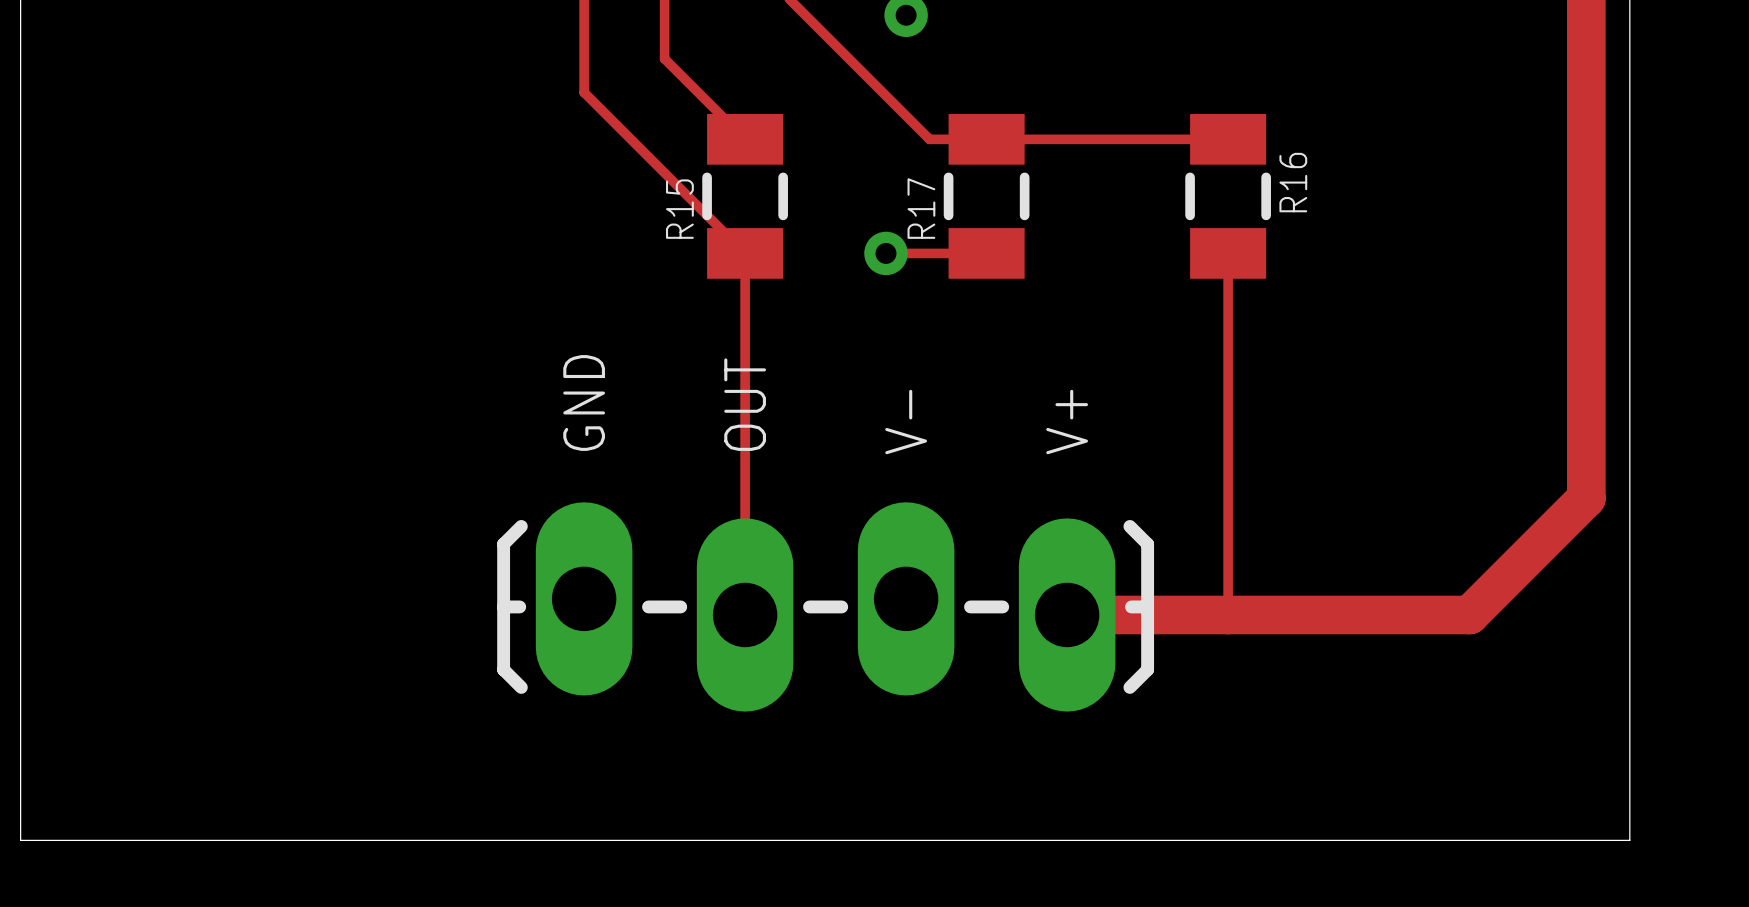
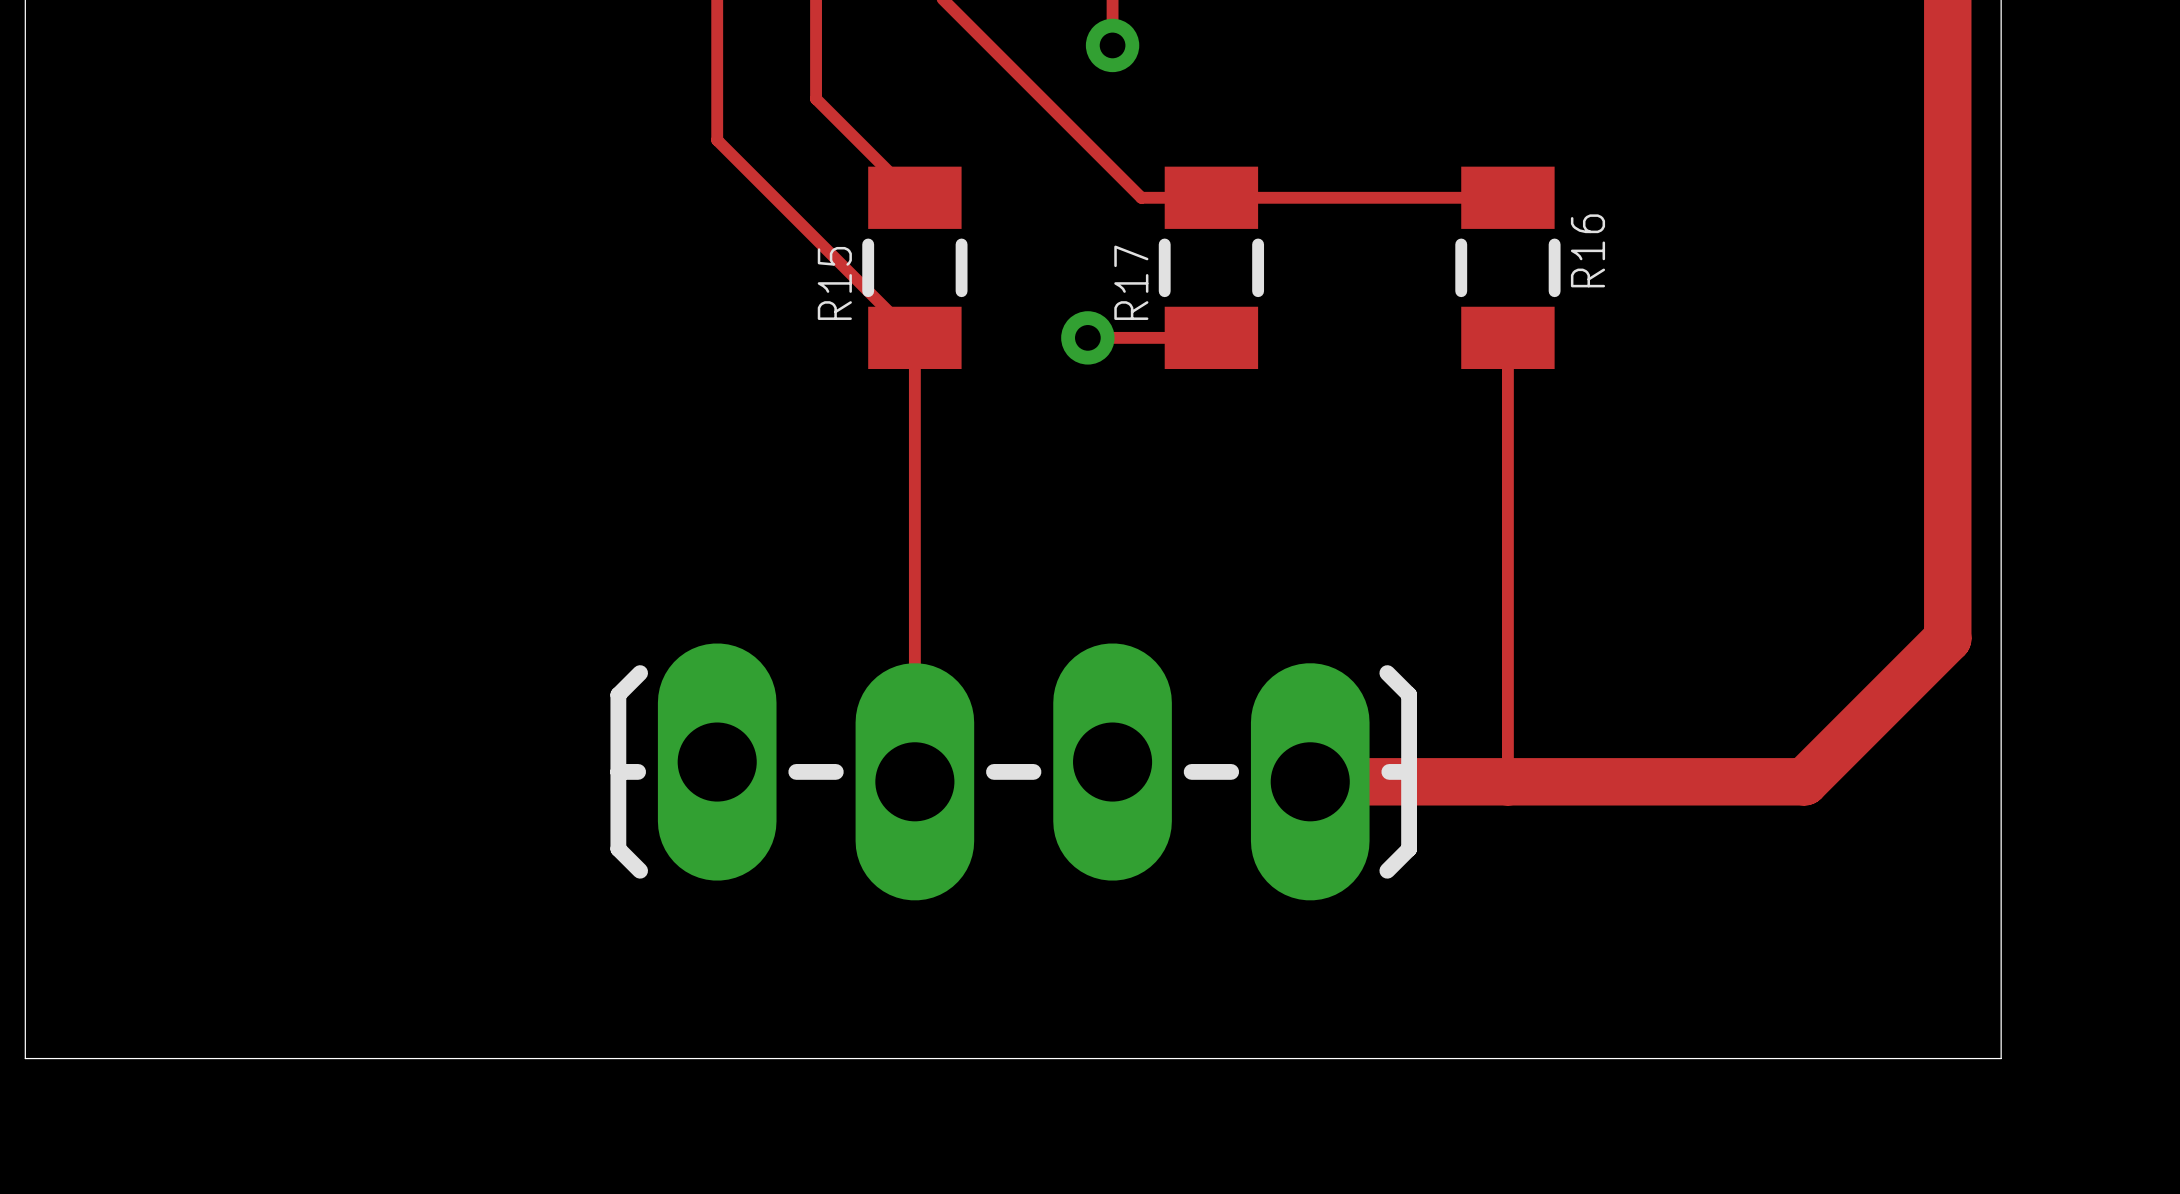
text: GND (584, 402) -> none
text: OUT (745, 404) -> none
text: V- (906, 422) -> none
text: V+ (1067, 422) -> none

